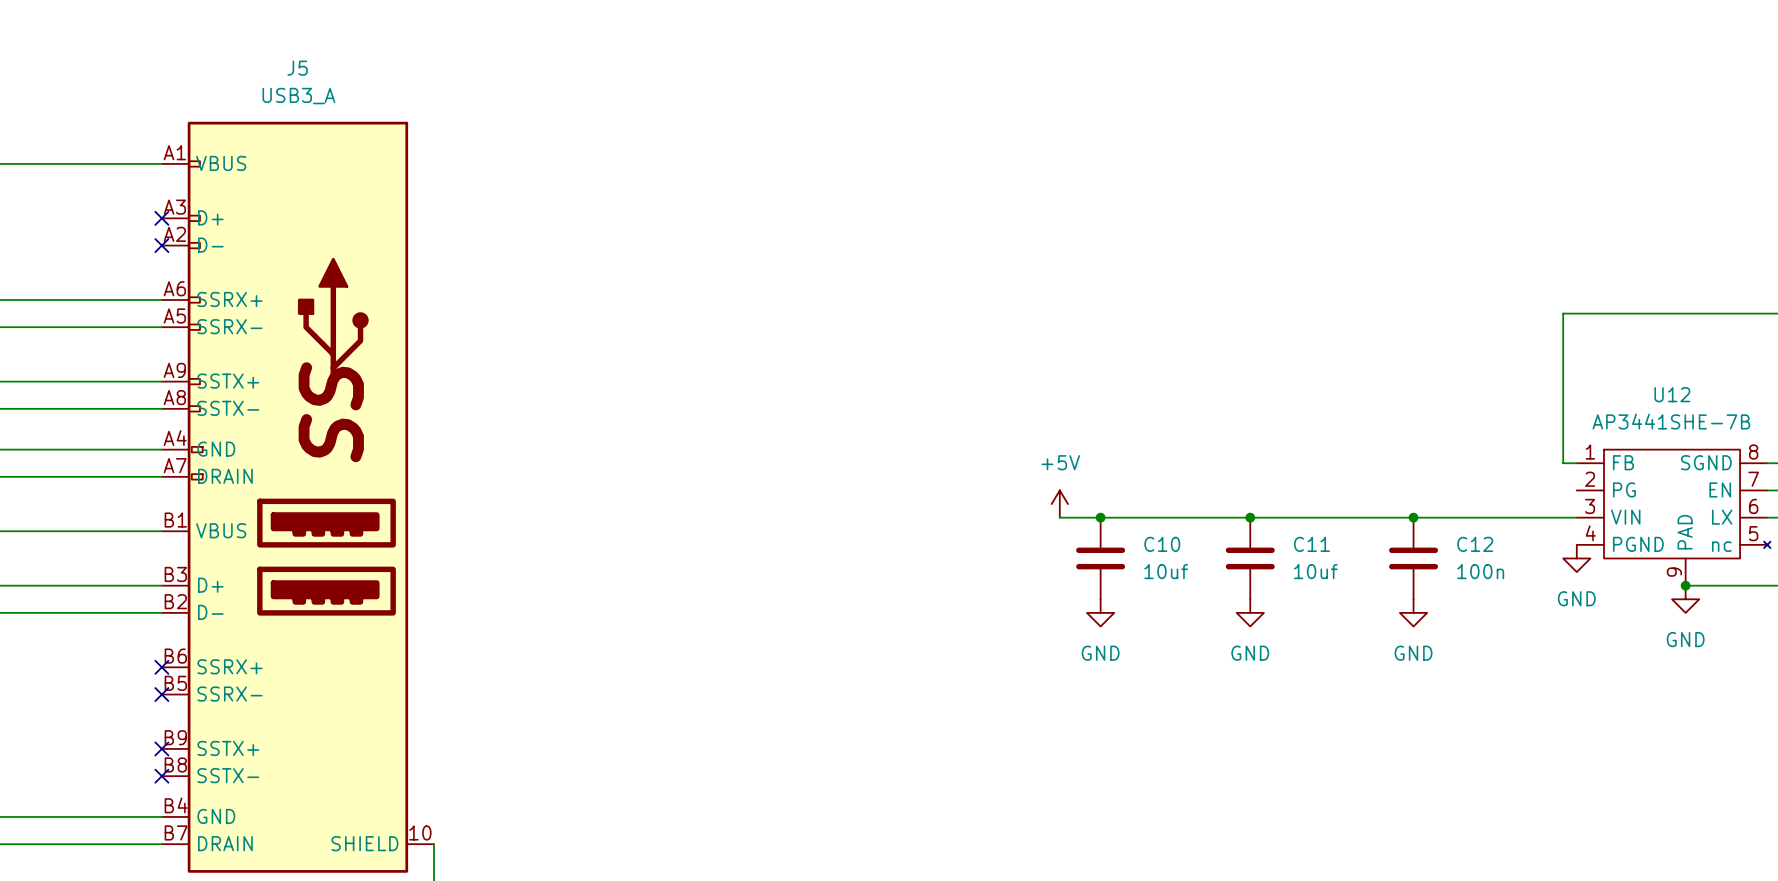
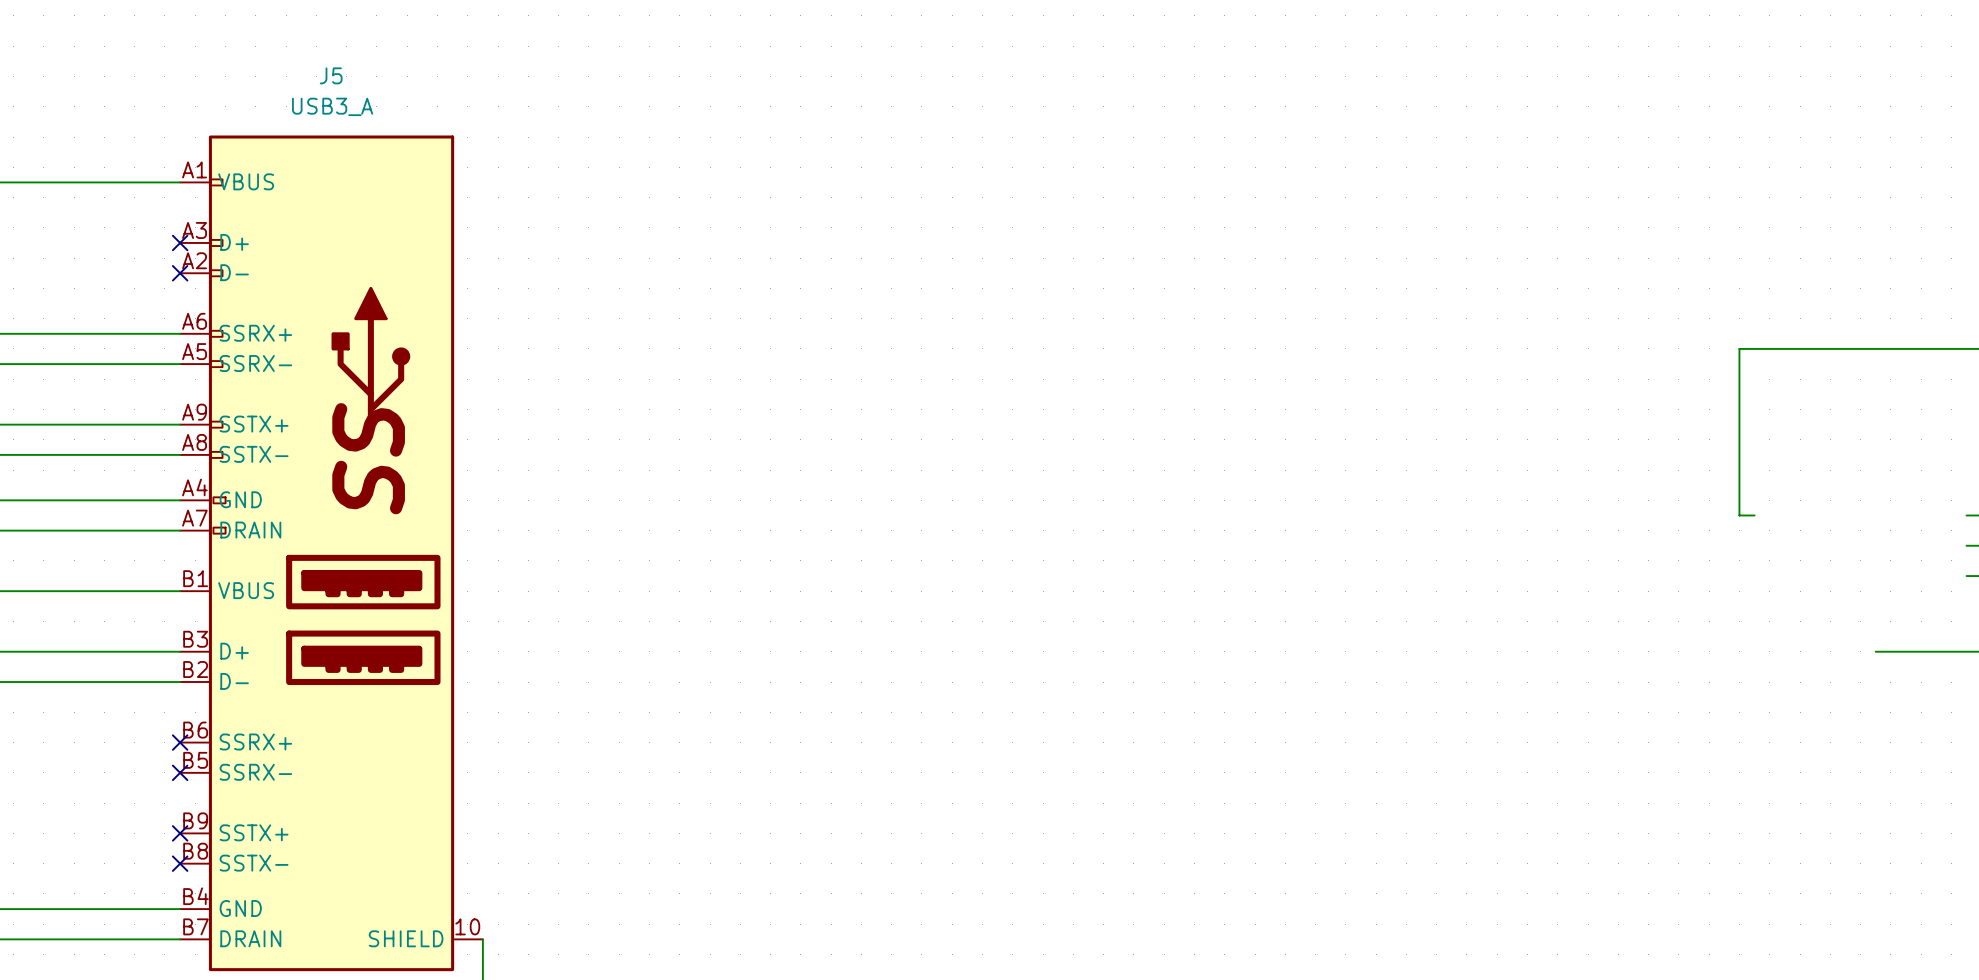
power symbol: +5V (1059, 504) -> none
wire: (1059, 517) (1576, 517) -> none
junction: (1100, 517) -> none
junction: (1250, 517) -> none
junction: (1413, 517) -> none
U12: AP3441SHE-7B (1673, 517) -> none
C10: 10uf (1100, 558) -> none
C11: 10uf (1250, 558) -> none
C12: 100n (1413, 558) -> none
power symbol: GND (1576, 558) -> none
junction: (1685, 585) -> none
power symbol: GND (1685, 599) -> none
power symbol: GND (1100, 612) -> none
power symbol: GND (1250, 612) -> none
power symbol: GND (1413, 612) -> none

